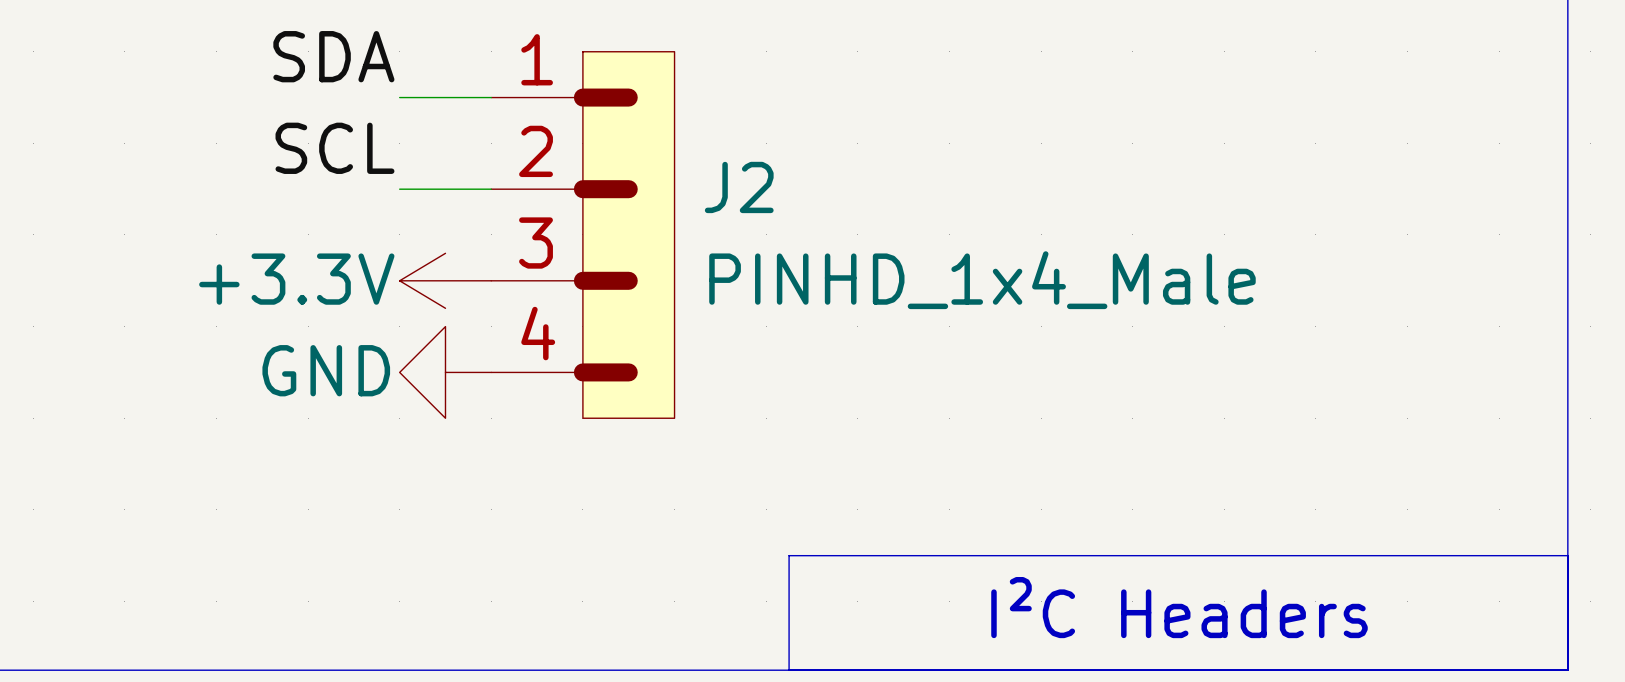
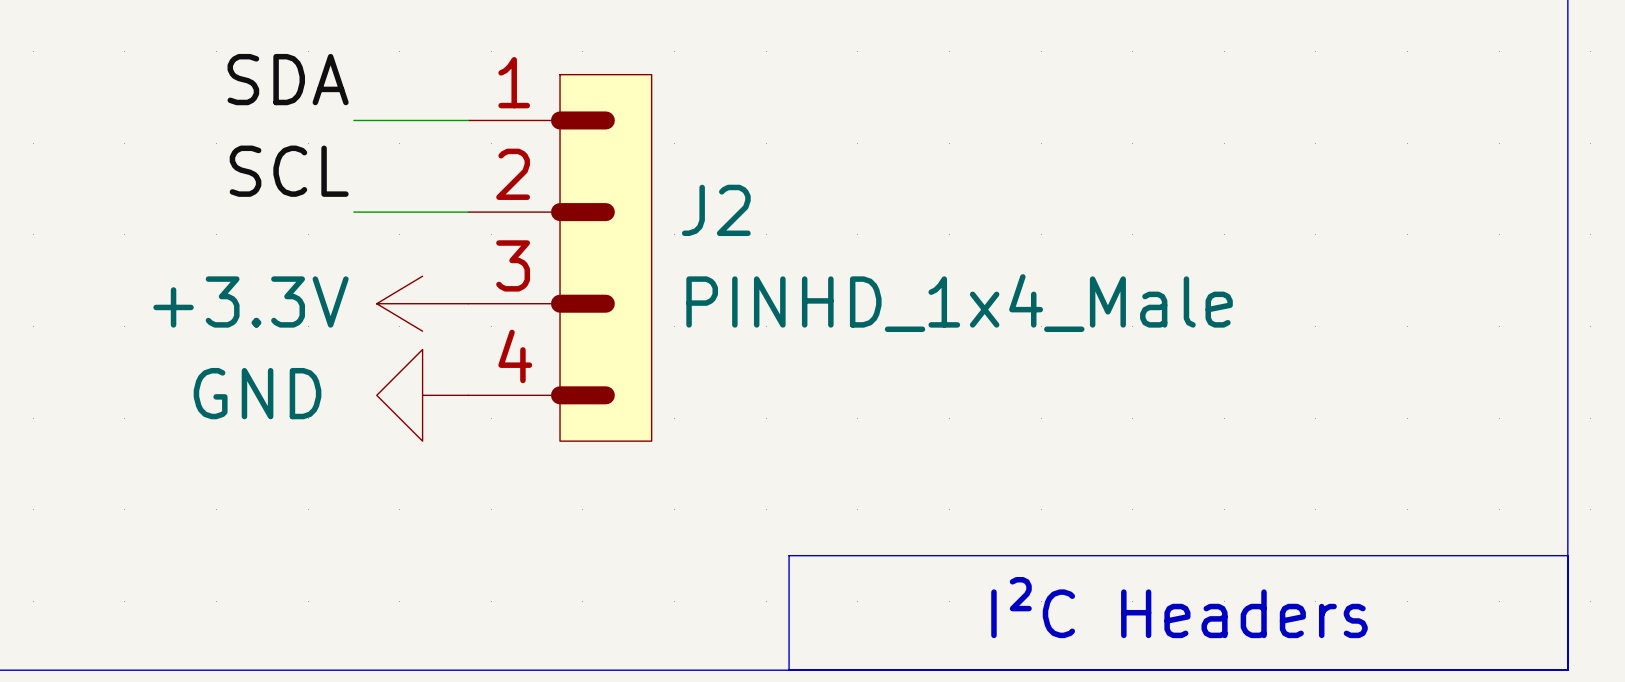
label position: SDA (333, 56) -> SDA (288, 79)
wire: (399, 97) (491, 97) -> none
wire: none -> (353, 120) (468, 120)
label position: SCL (334, 148) -> SCL (289, 171)
wire: (399, 189) (491, 189) -> none
wire: none -> (353, 212) (468, 212)
J2 position: (582, 234) -> (560, 257)
power symbol text position: +3.3V (296, 279) -> +3.3V (250, 301)
power symbol position: +3.3V (445, 280) -> +3.3V (422, 303)
power symbol text position: GND (326, 370) -> GND (257, 393)
power symbol position: GND (445, 372) -> GND (422, 395)

